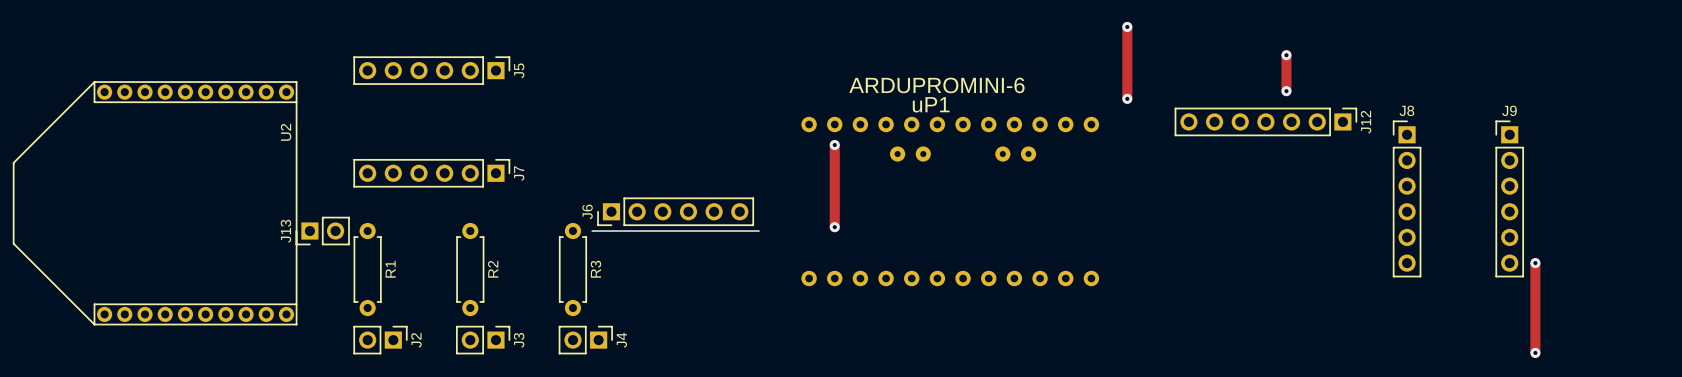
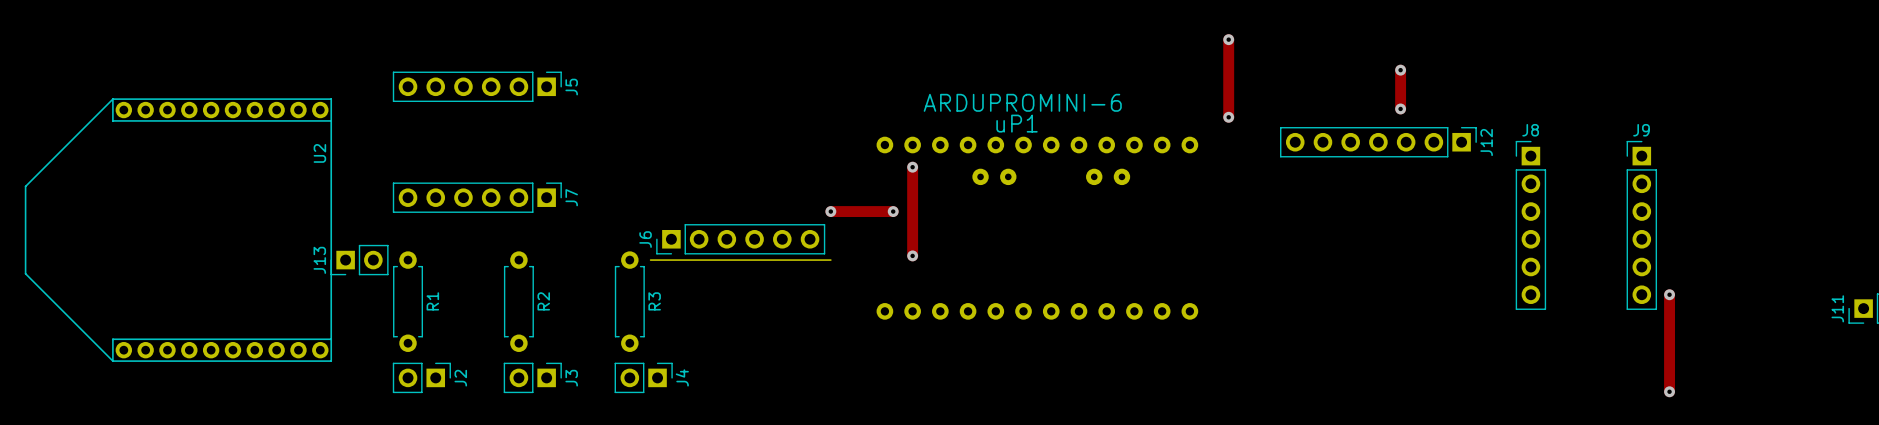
track: none -> (830, 211) (893, 211)
via: none -> (830, 211)
via: none -> (893, 211)

